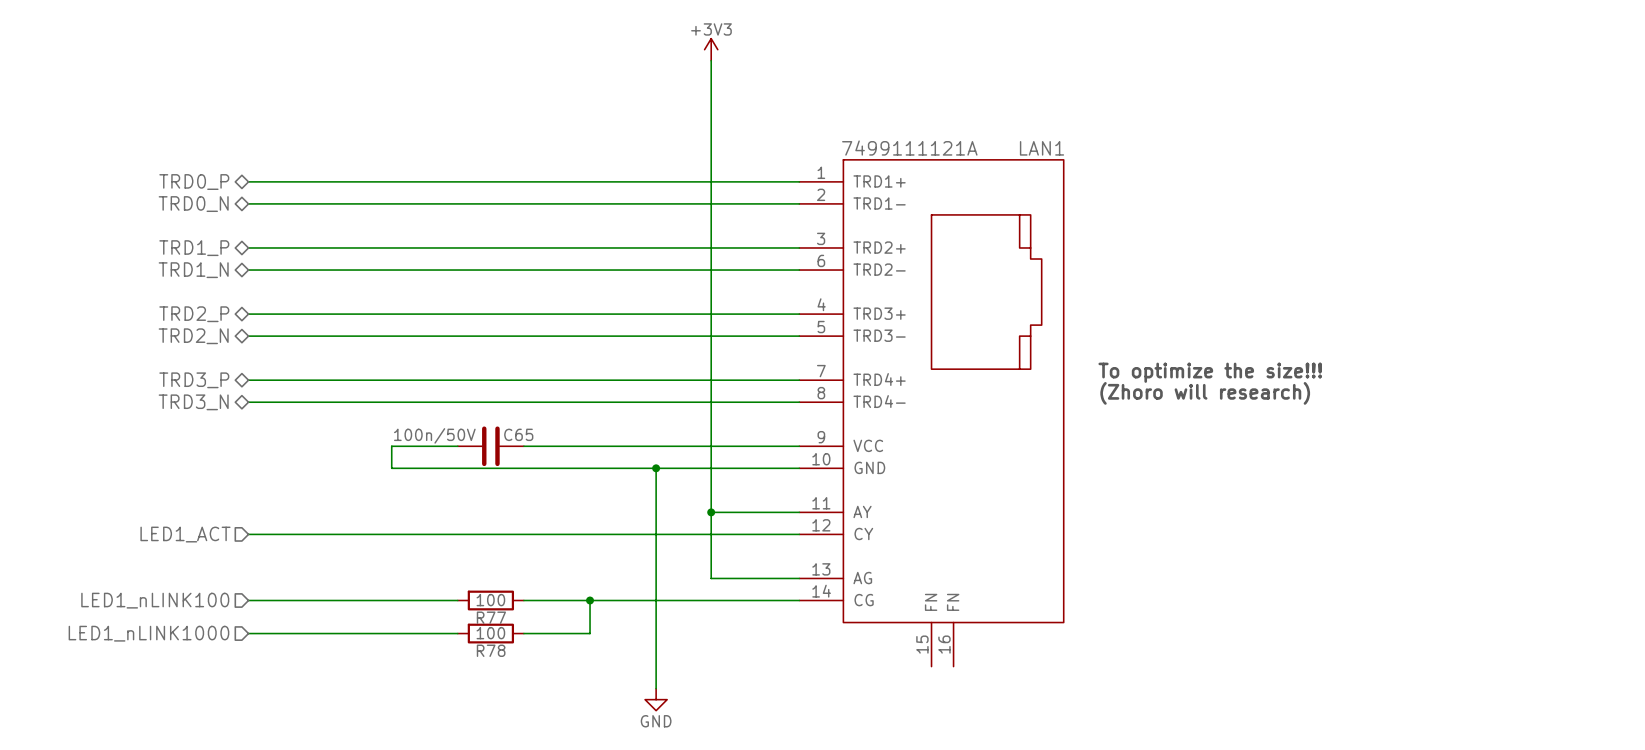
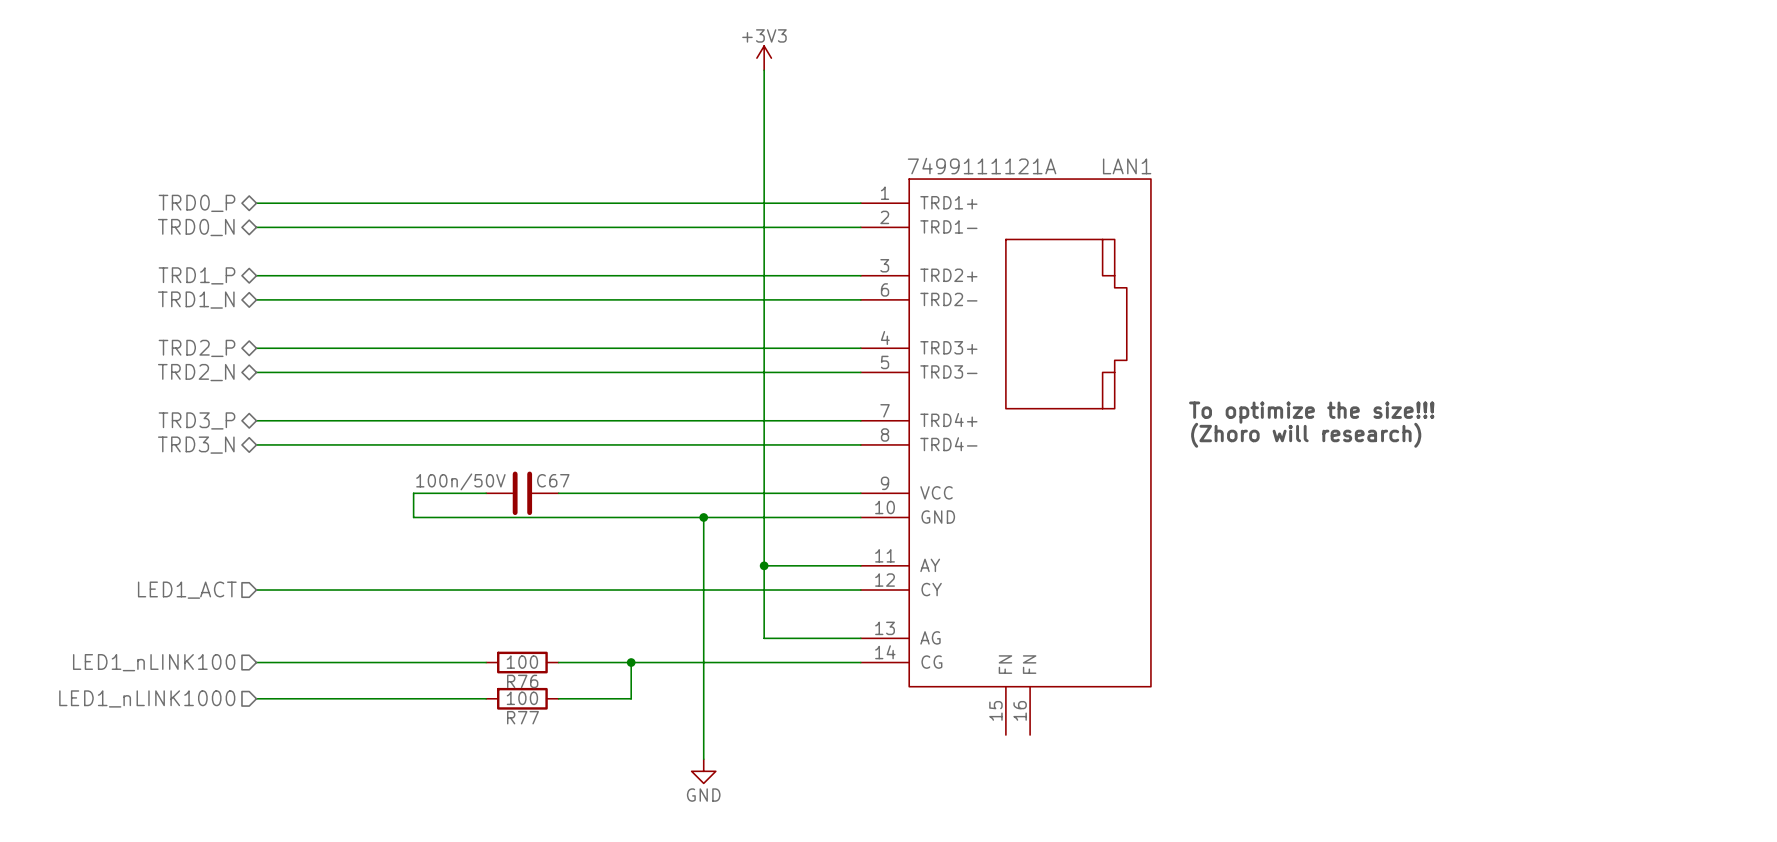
C65 name: C65 (518, 434) -> C67 (553, 480)
R77 name: R77 (491, 617) -> R76 (522, 681)
R78 name: R78 (491, 650) -> R77 (522, 717)

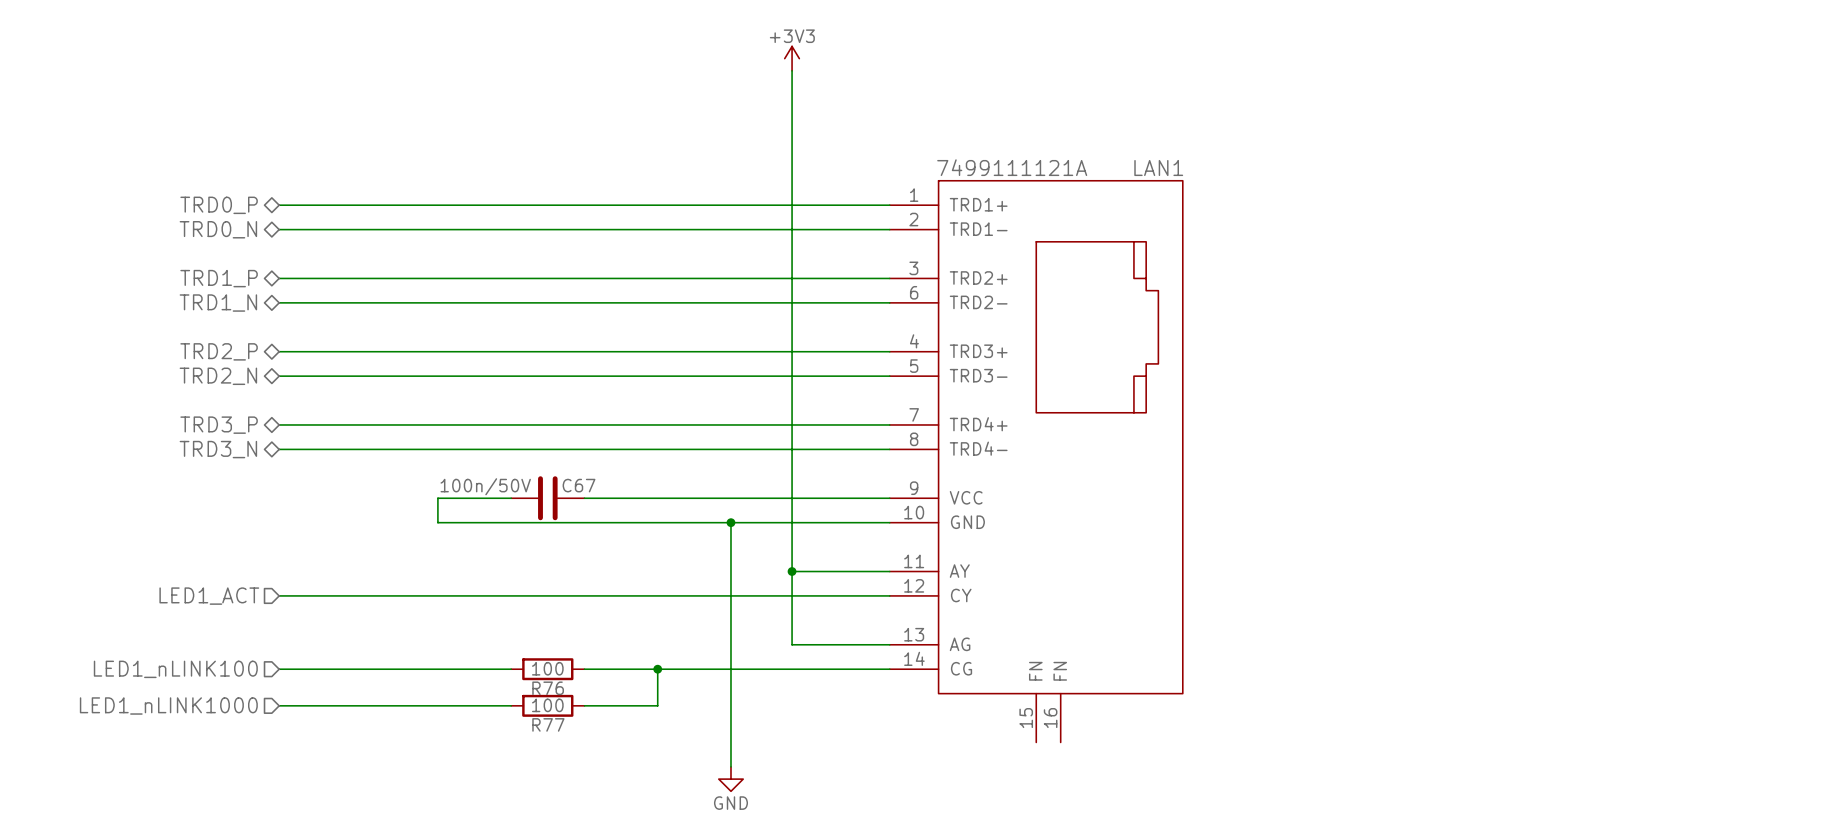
text: To optimize the size!!! (1311, 412) -> none
text: (Zhoro will research) (1306, 435) -> none

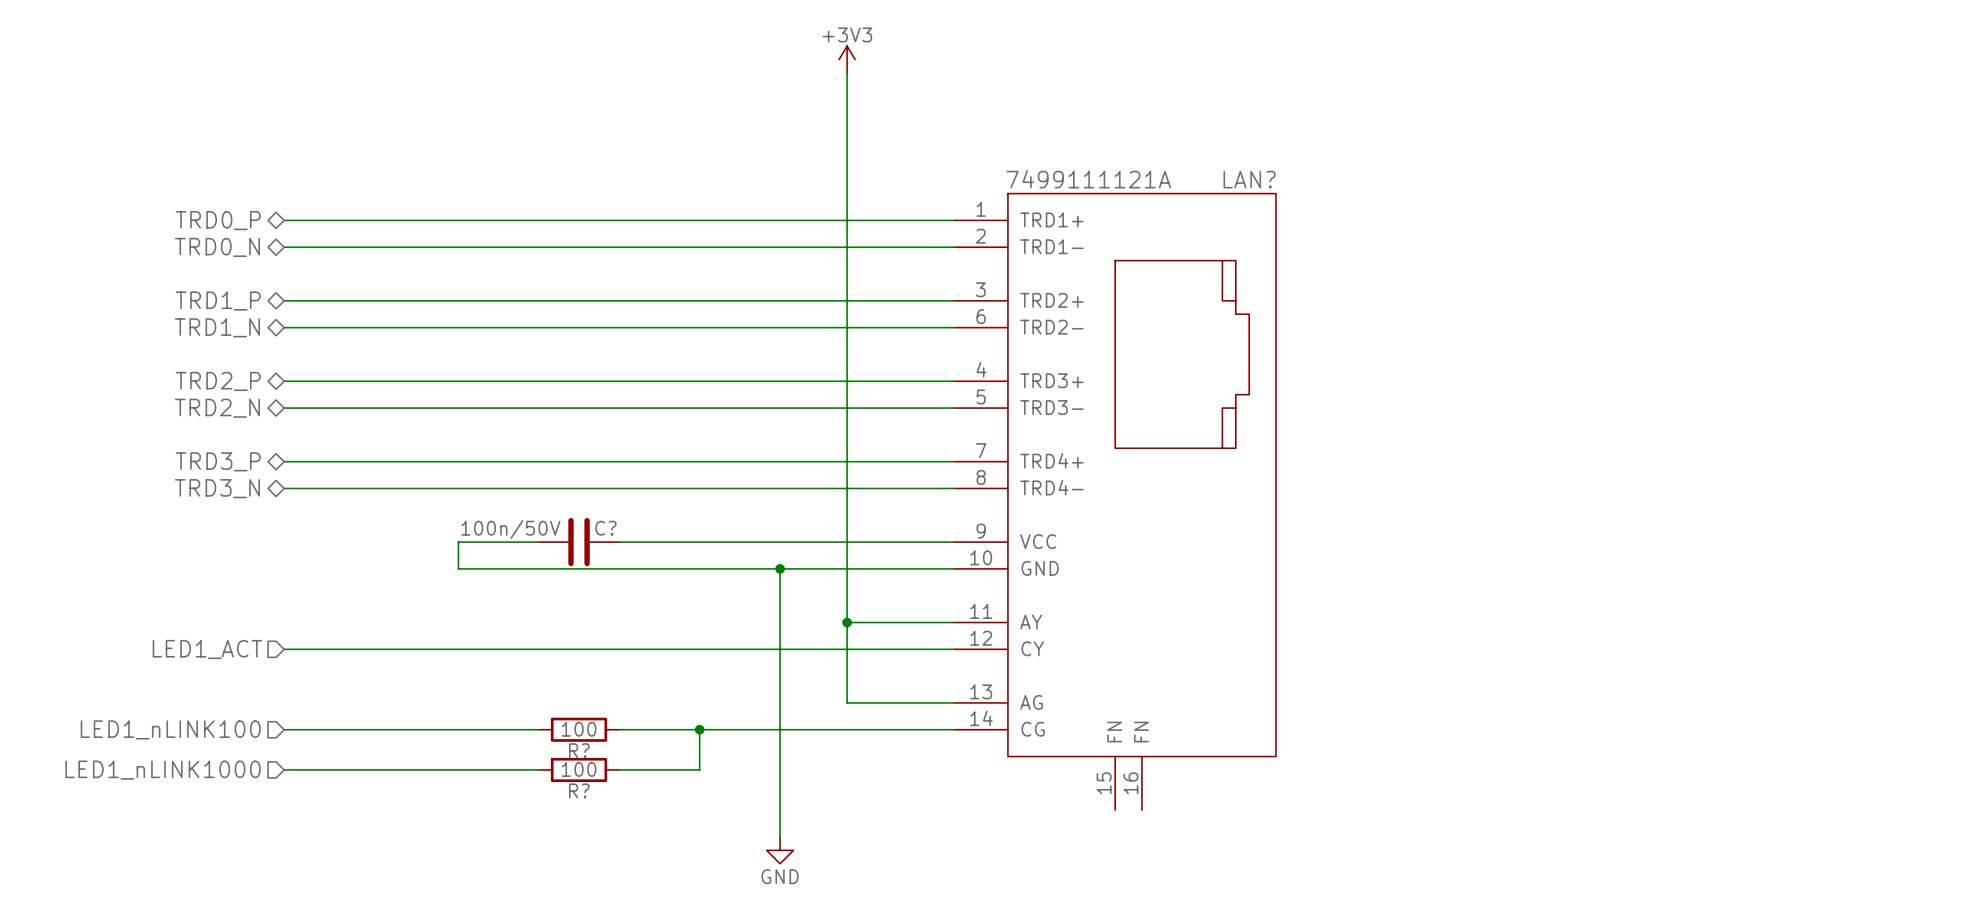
LAN1 name: LAN1 (1158, 168) -> LAN? (1249, 179)
C67 name: C67 (579, 485) -> C? (605, 528)
R76 name: R76 (548, 688) -> R? (579, 750)
R77 name: R77 (548, 724) -> R? (579, 790)

